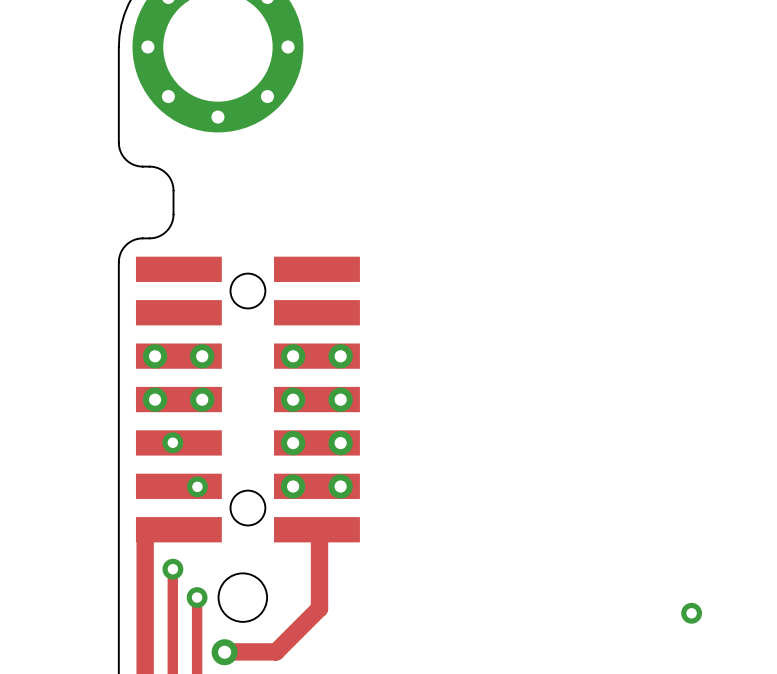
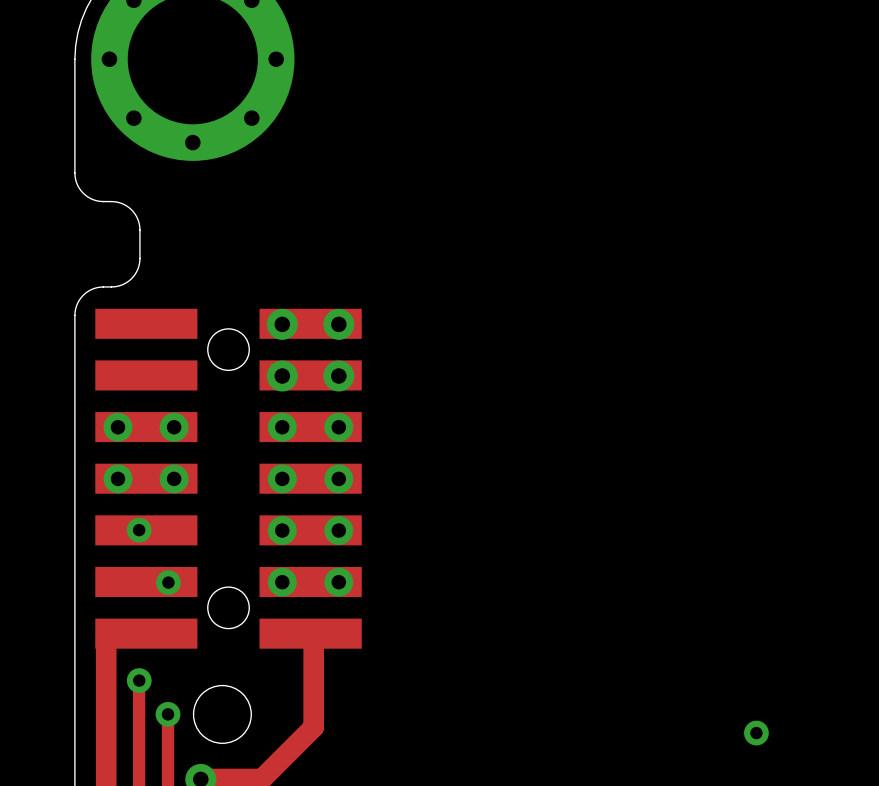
via: none -> (282, 324)
via: none -> (338, 324)
via: none -> (282, 376)
via: none -> (338, 376)

